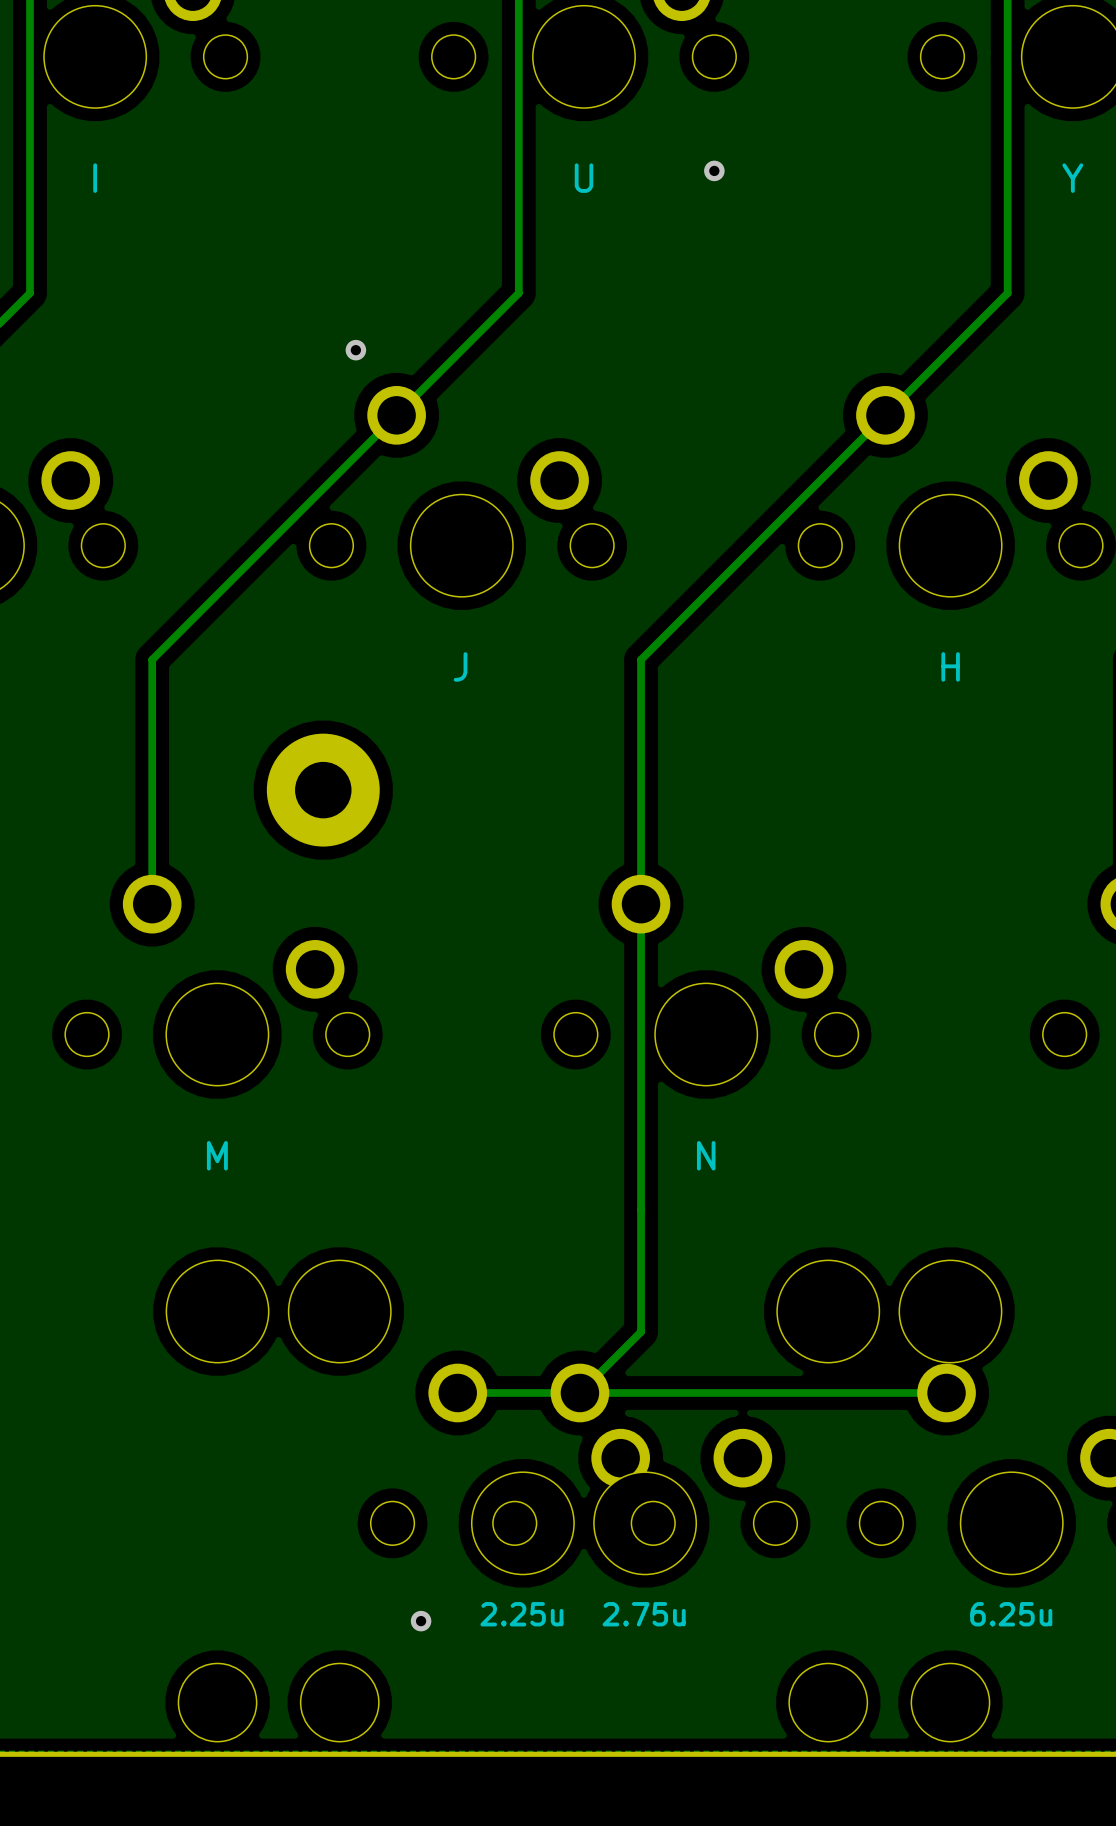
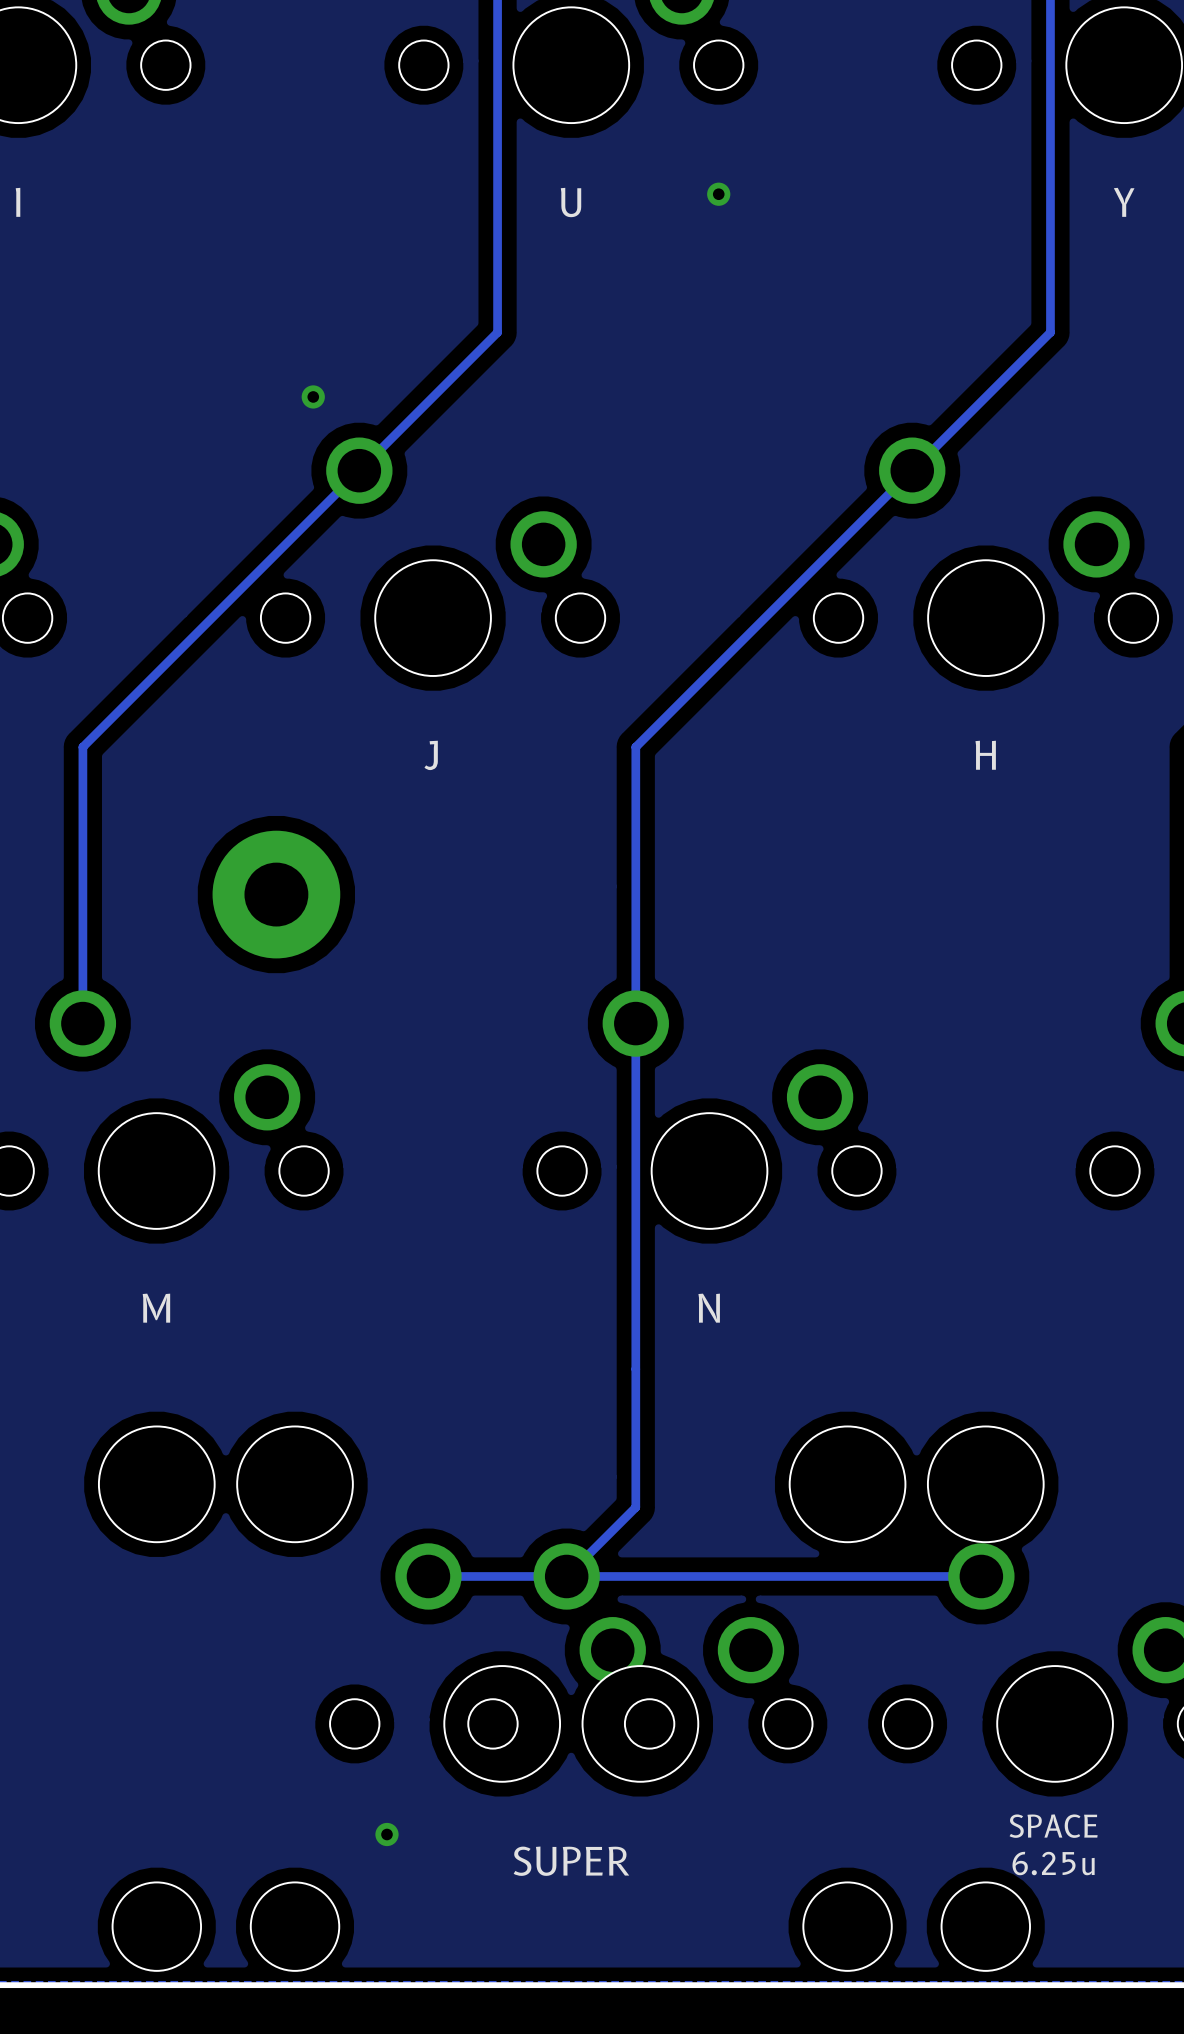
text: 2.25u (521, 1614) -> none
text: 2.75u (644, 1614) -> none
text: 6.25u (1011, 1614) -> SPACE (1053, 1826)
text: none -> SUPER (571, 1861)
text: none -> 6.25u (1053, 1863)

